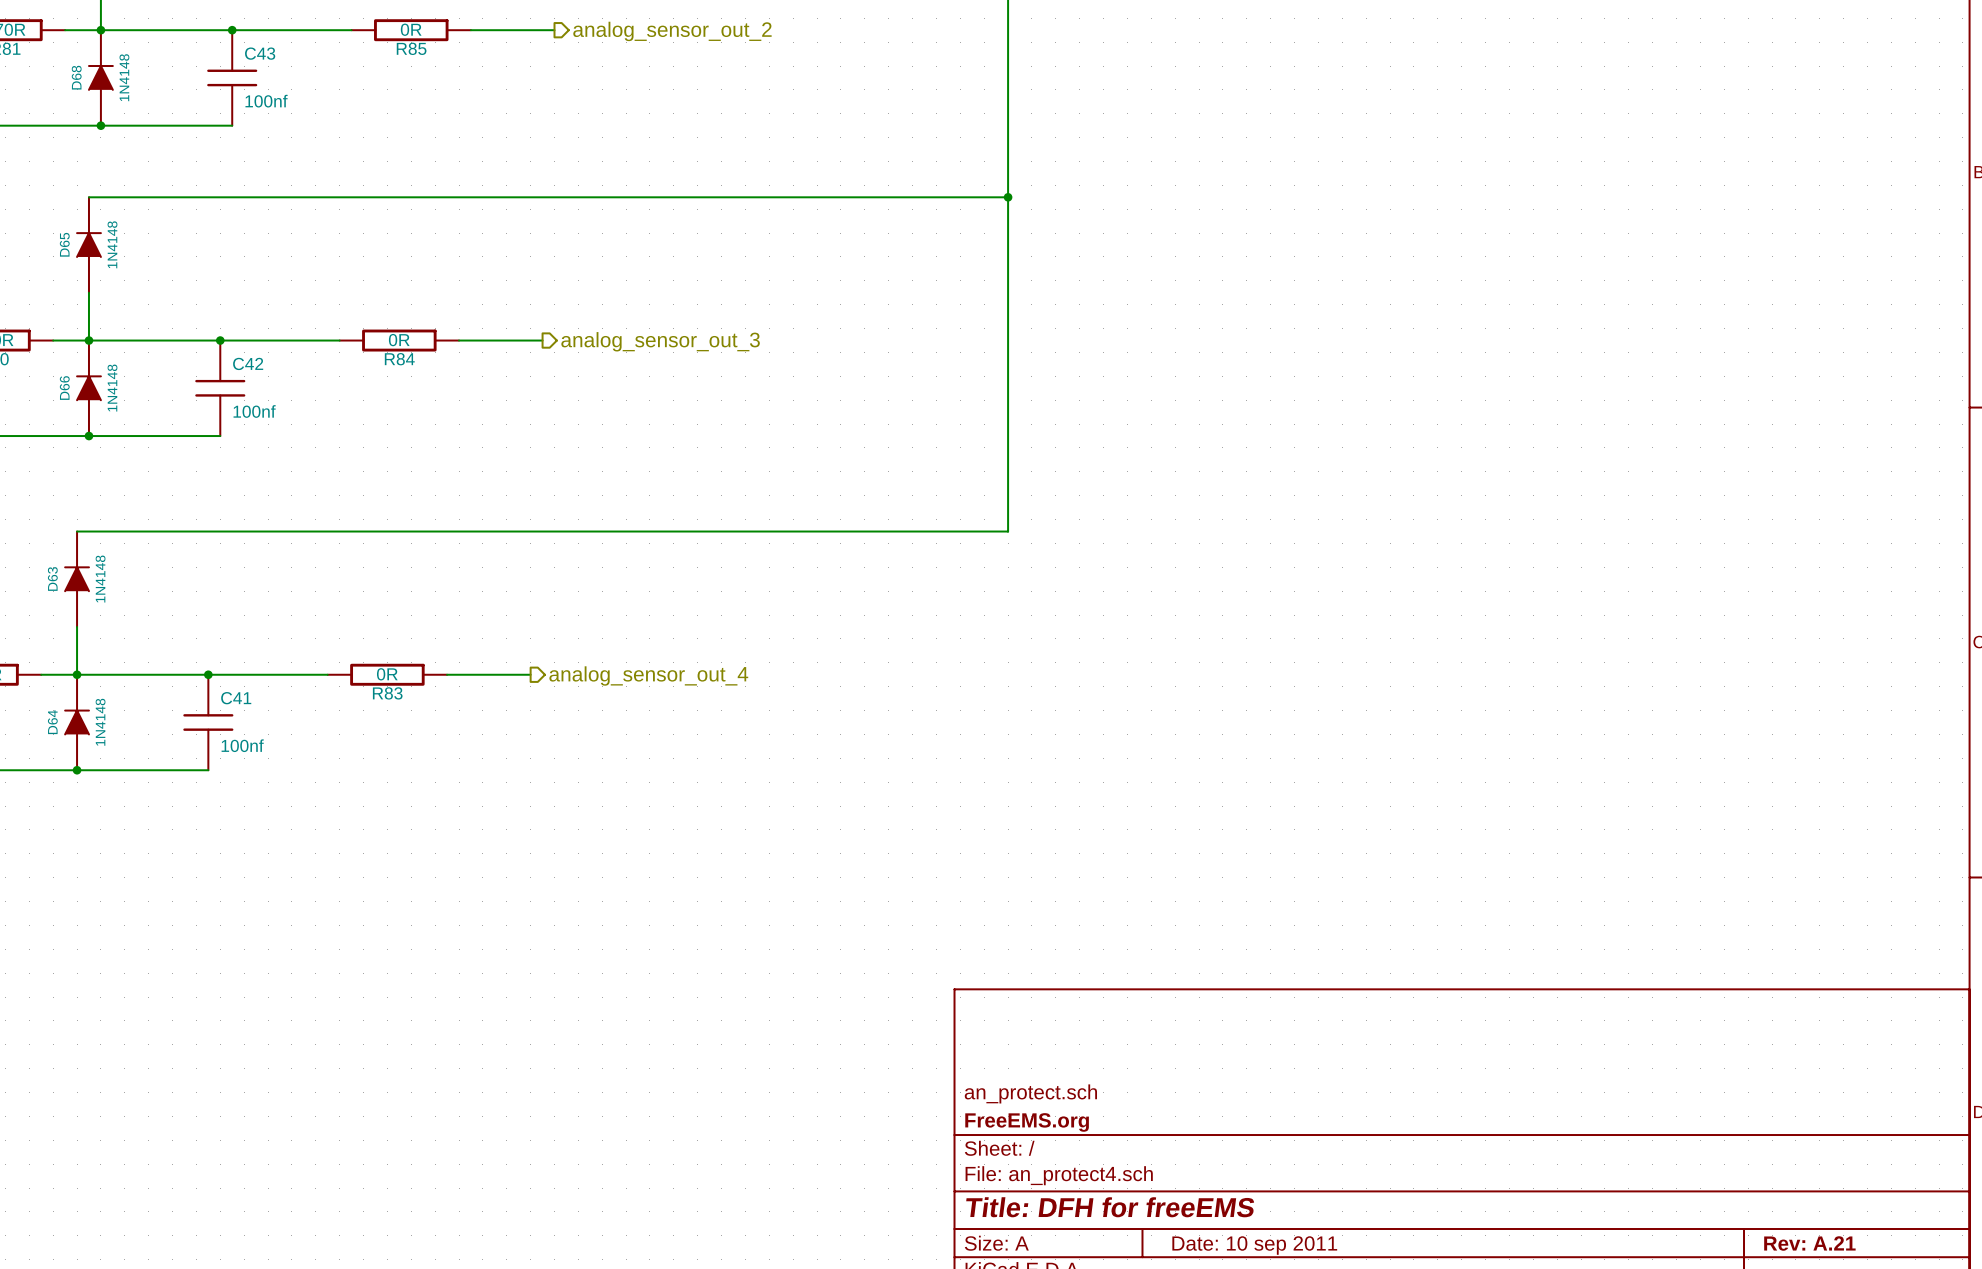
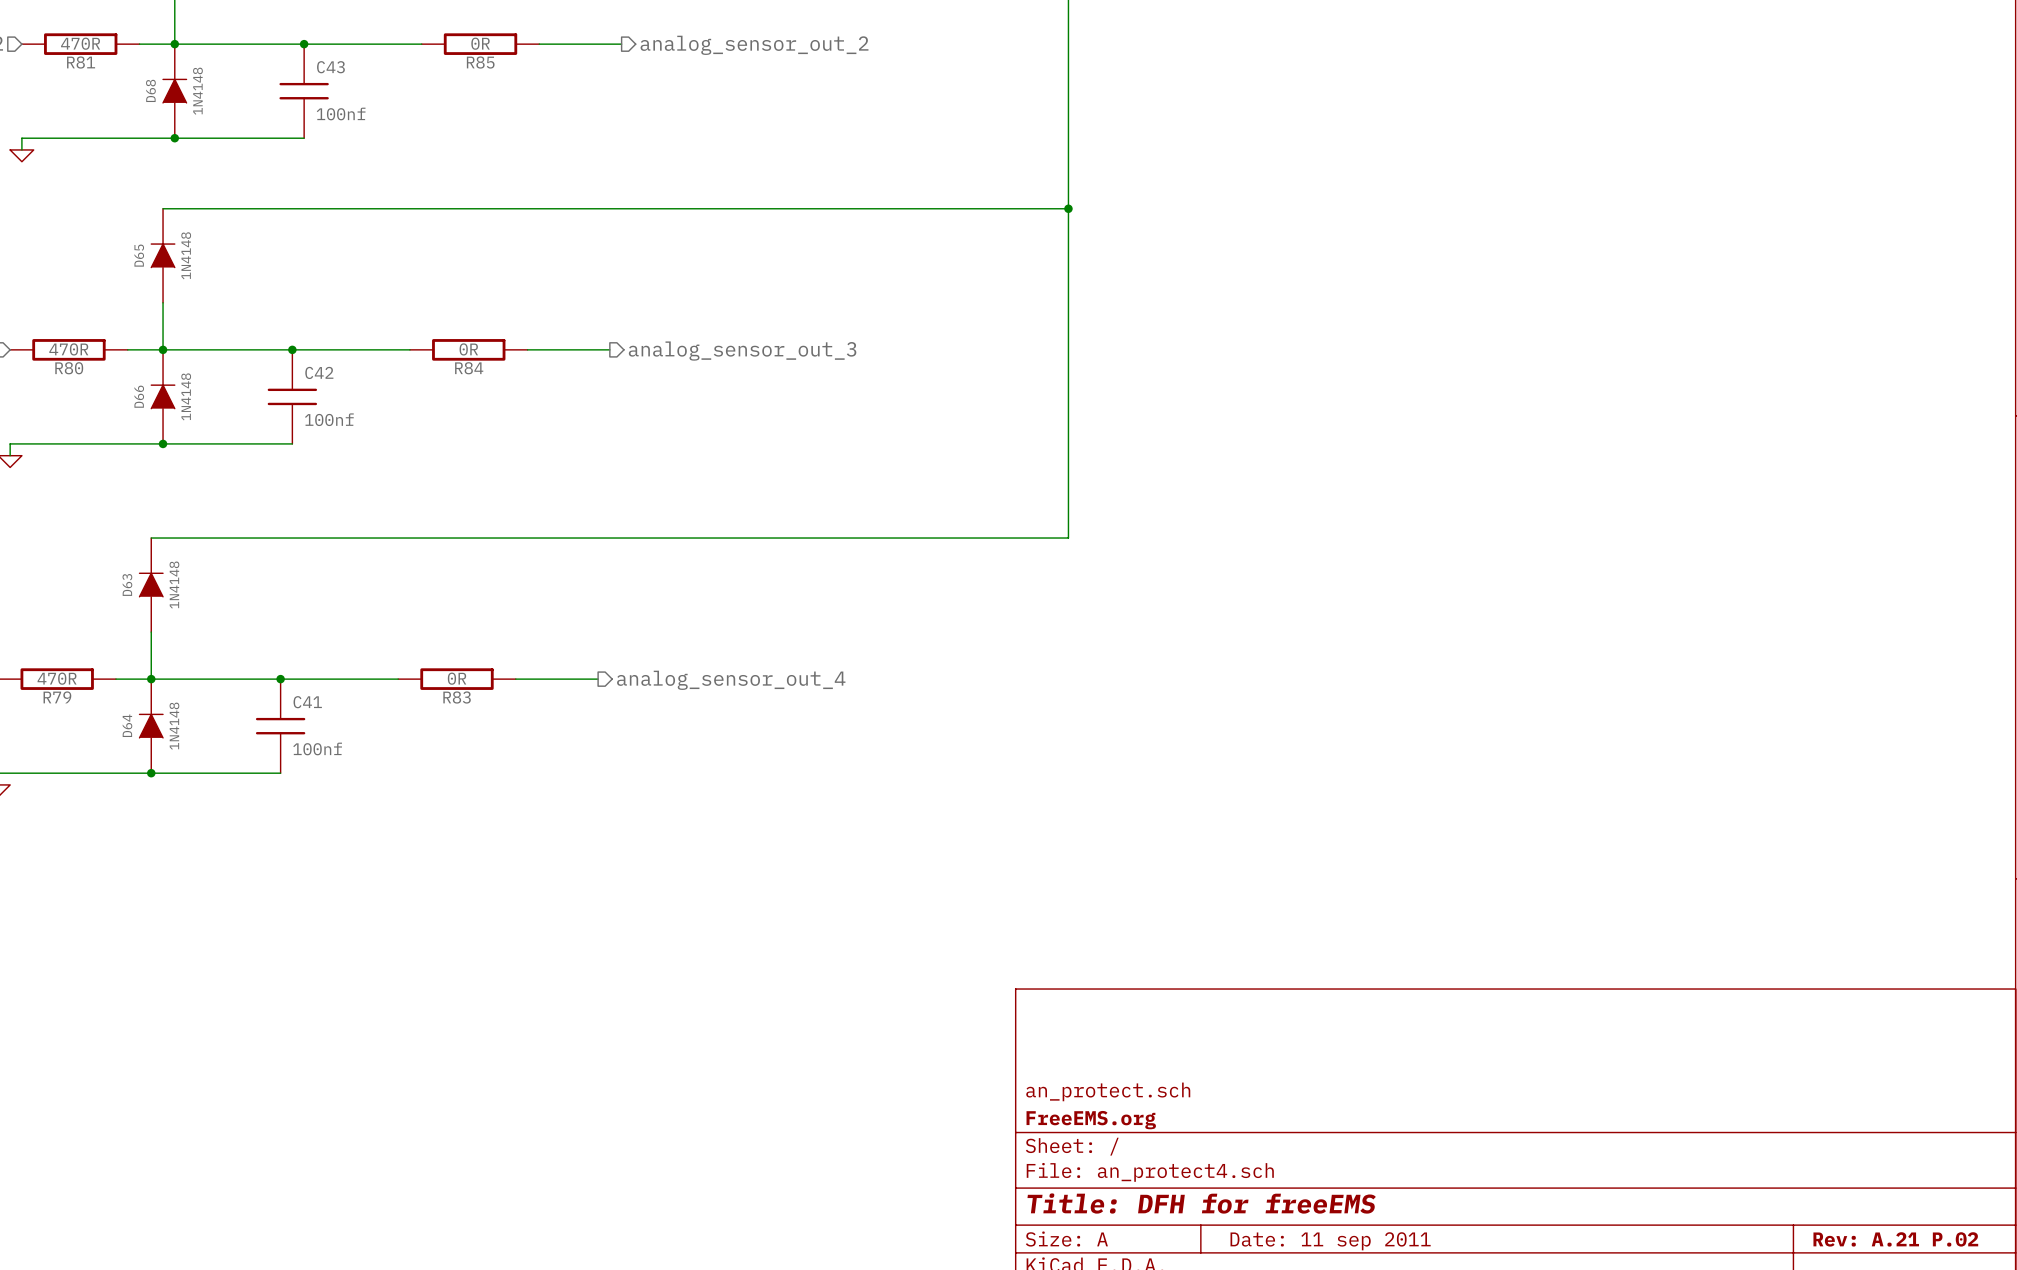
title block: Rev: A.21 (1809, 1243) -> Rev: A.21 P.02 (1895, 1239)
title block: Date: 10 sep 2011 (1254, 1245) -> Date: 11 sep 2011 (1330, 1241)

